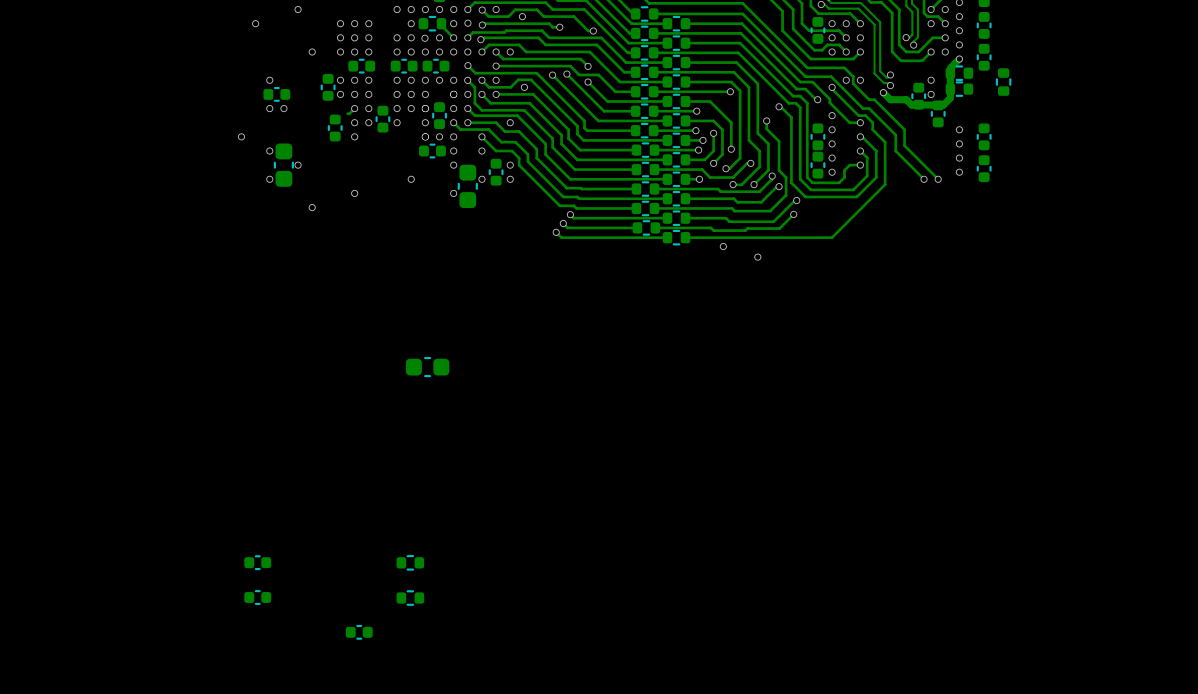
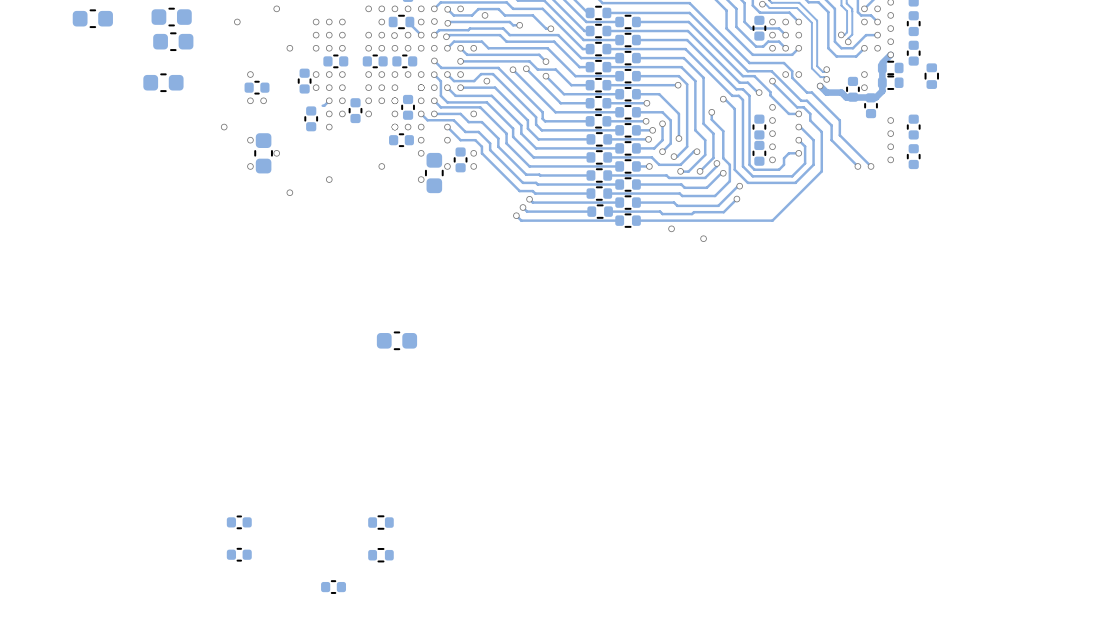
part: none -> (171, 17)
part: none -> (92, 18)
part: none -> (173, 41)
part: none -> (163, 82)

